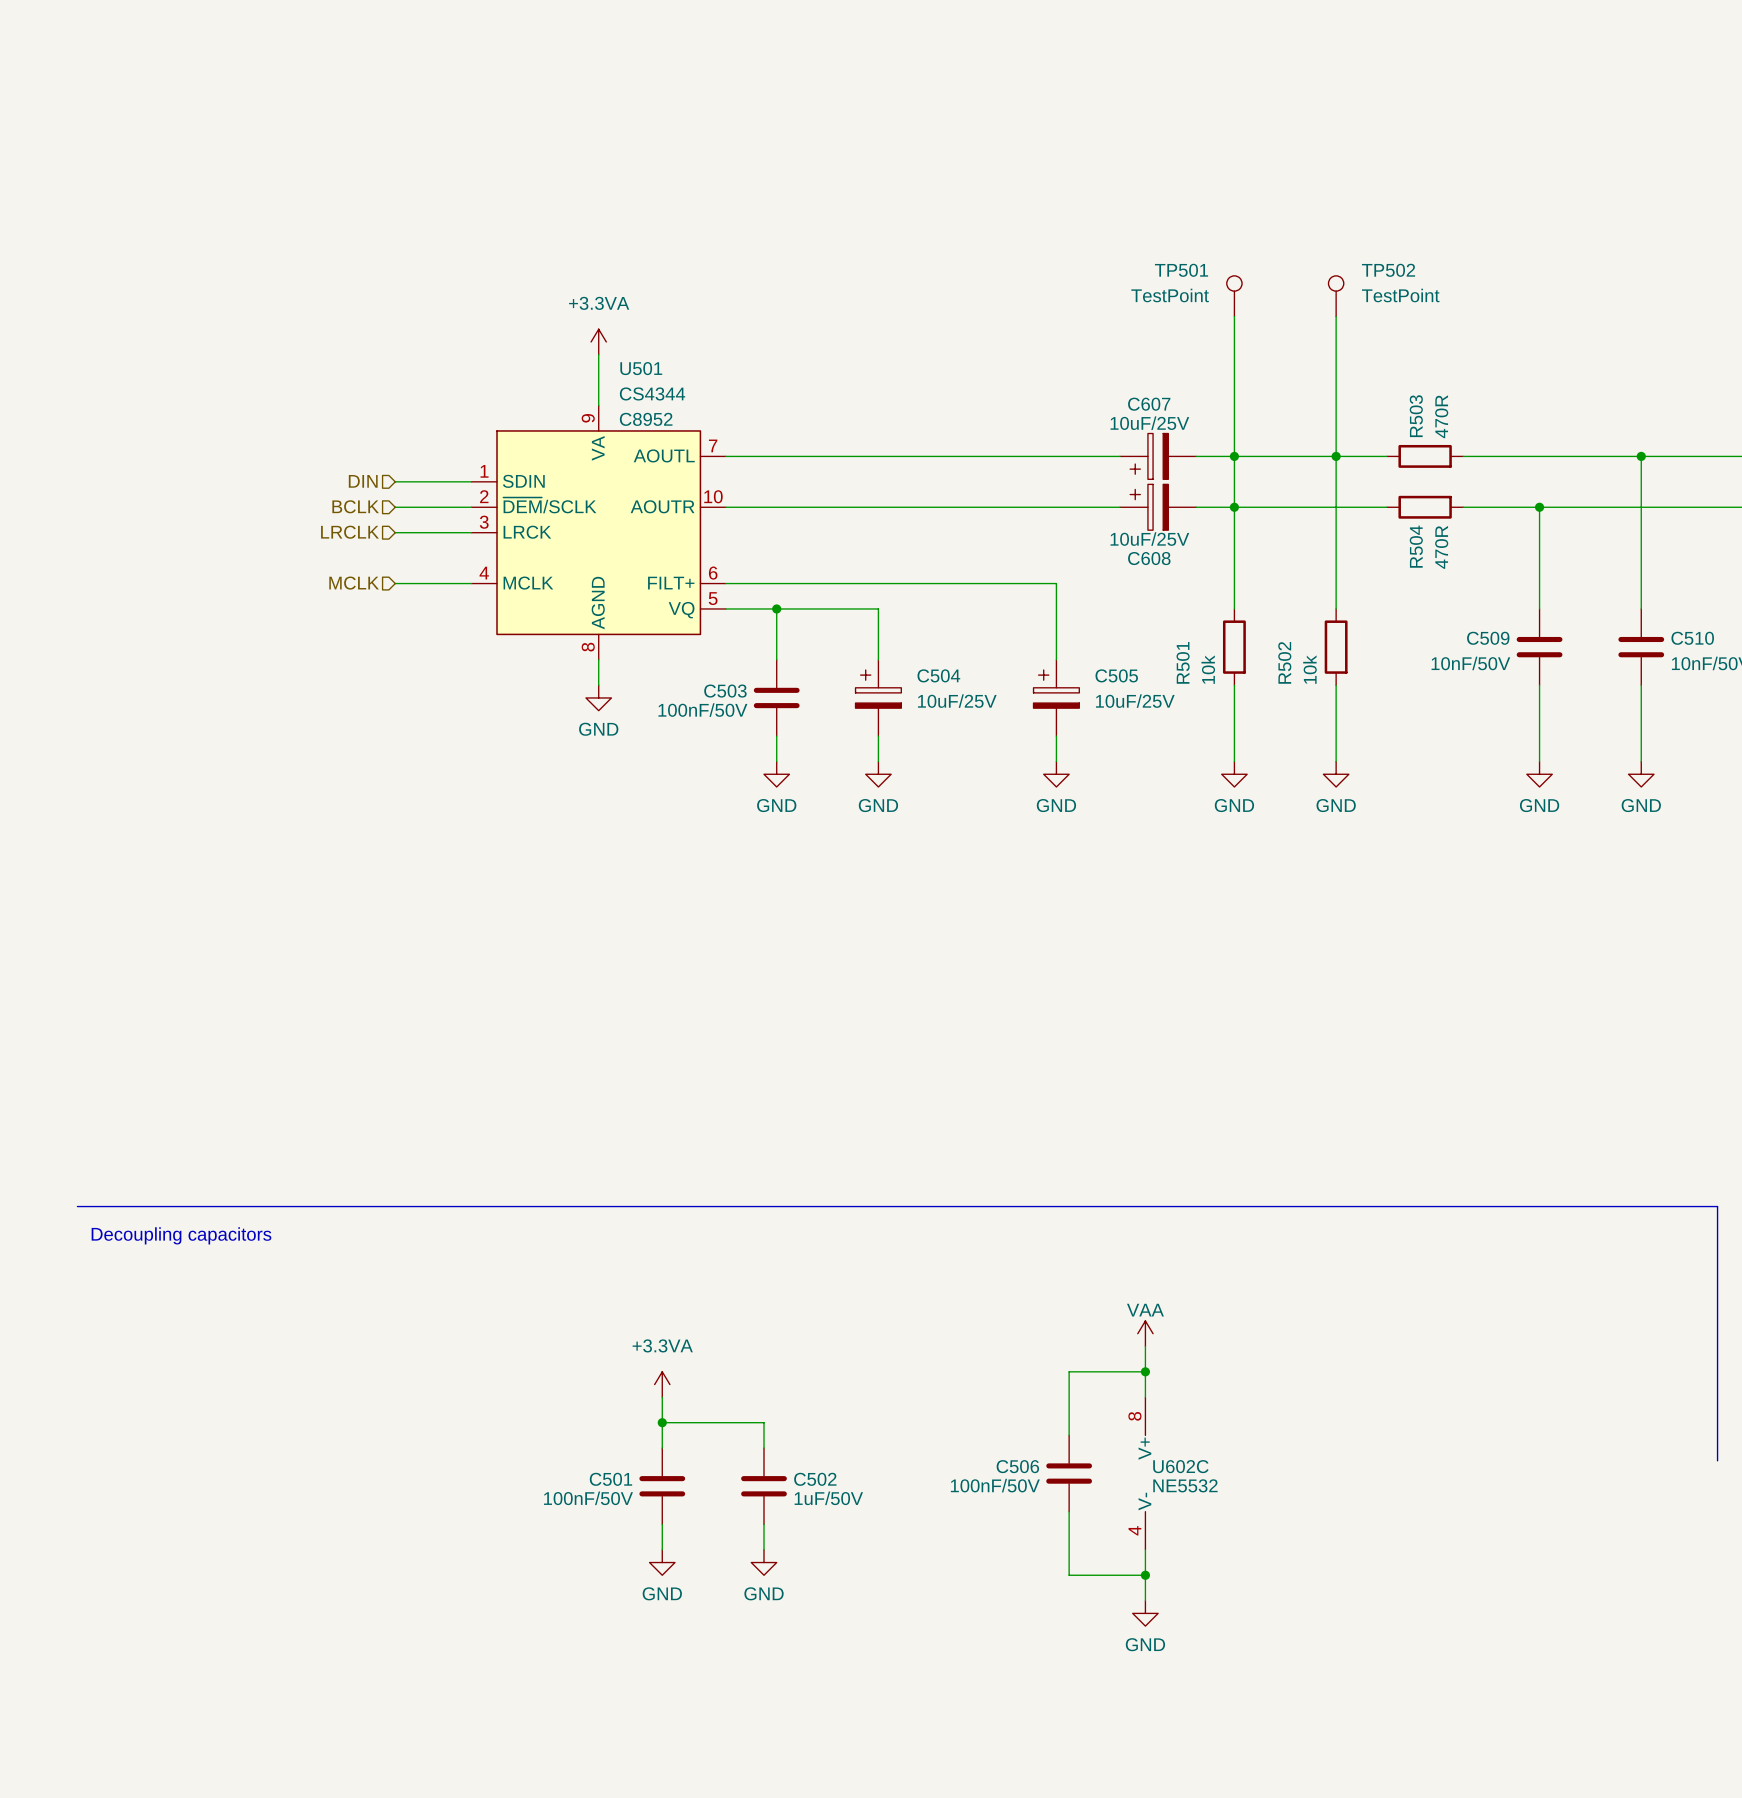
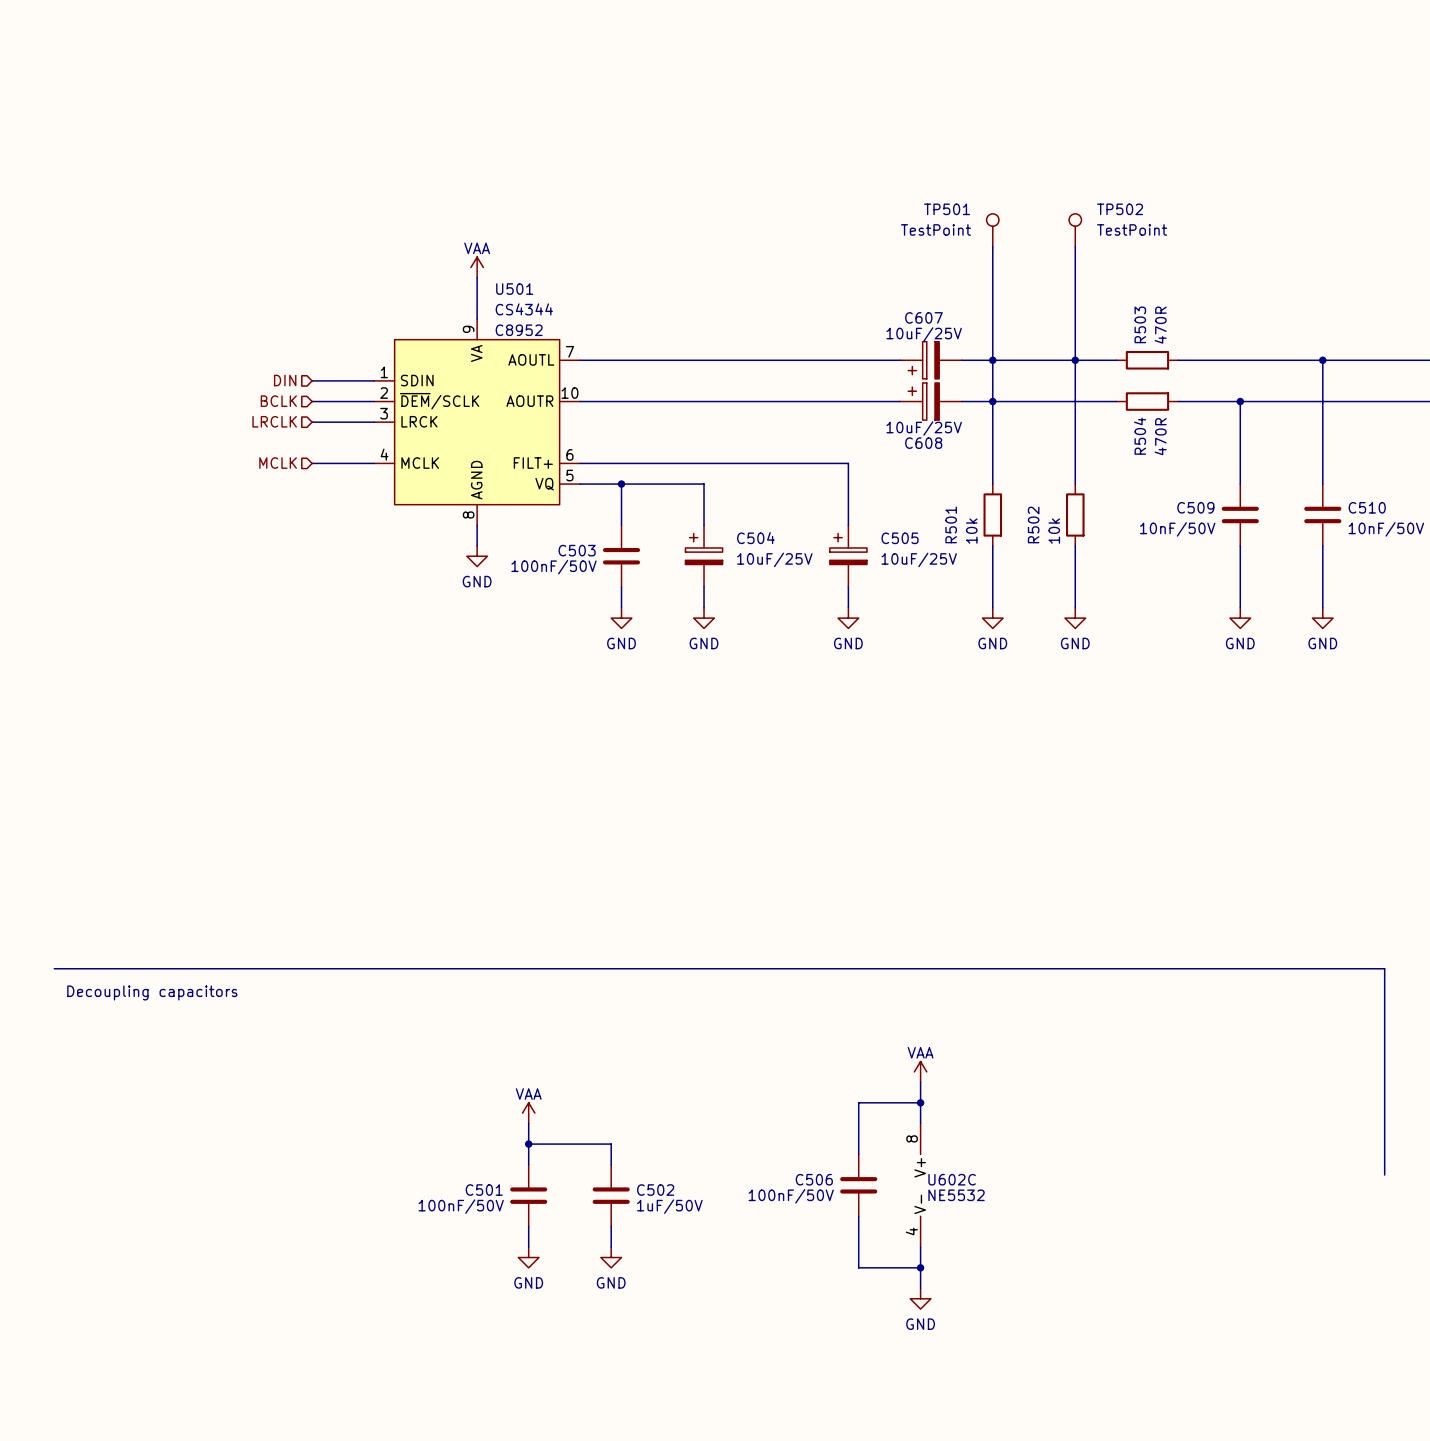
power symbol: +3.3VA (598, 341) -> VAA (477, 267)
power symbol: +3.3VA (662, 1384) -> VAA (528, 1113)

